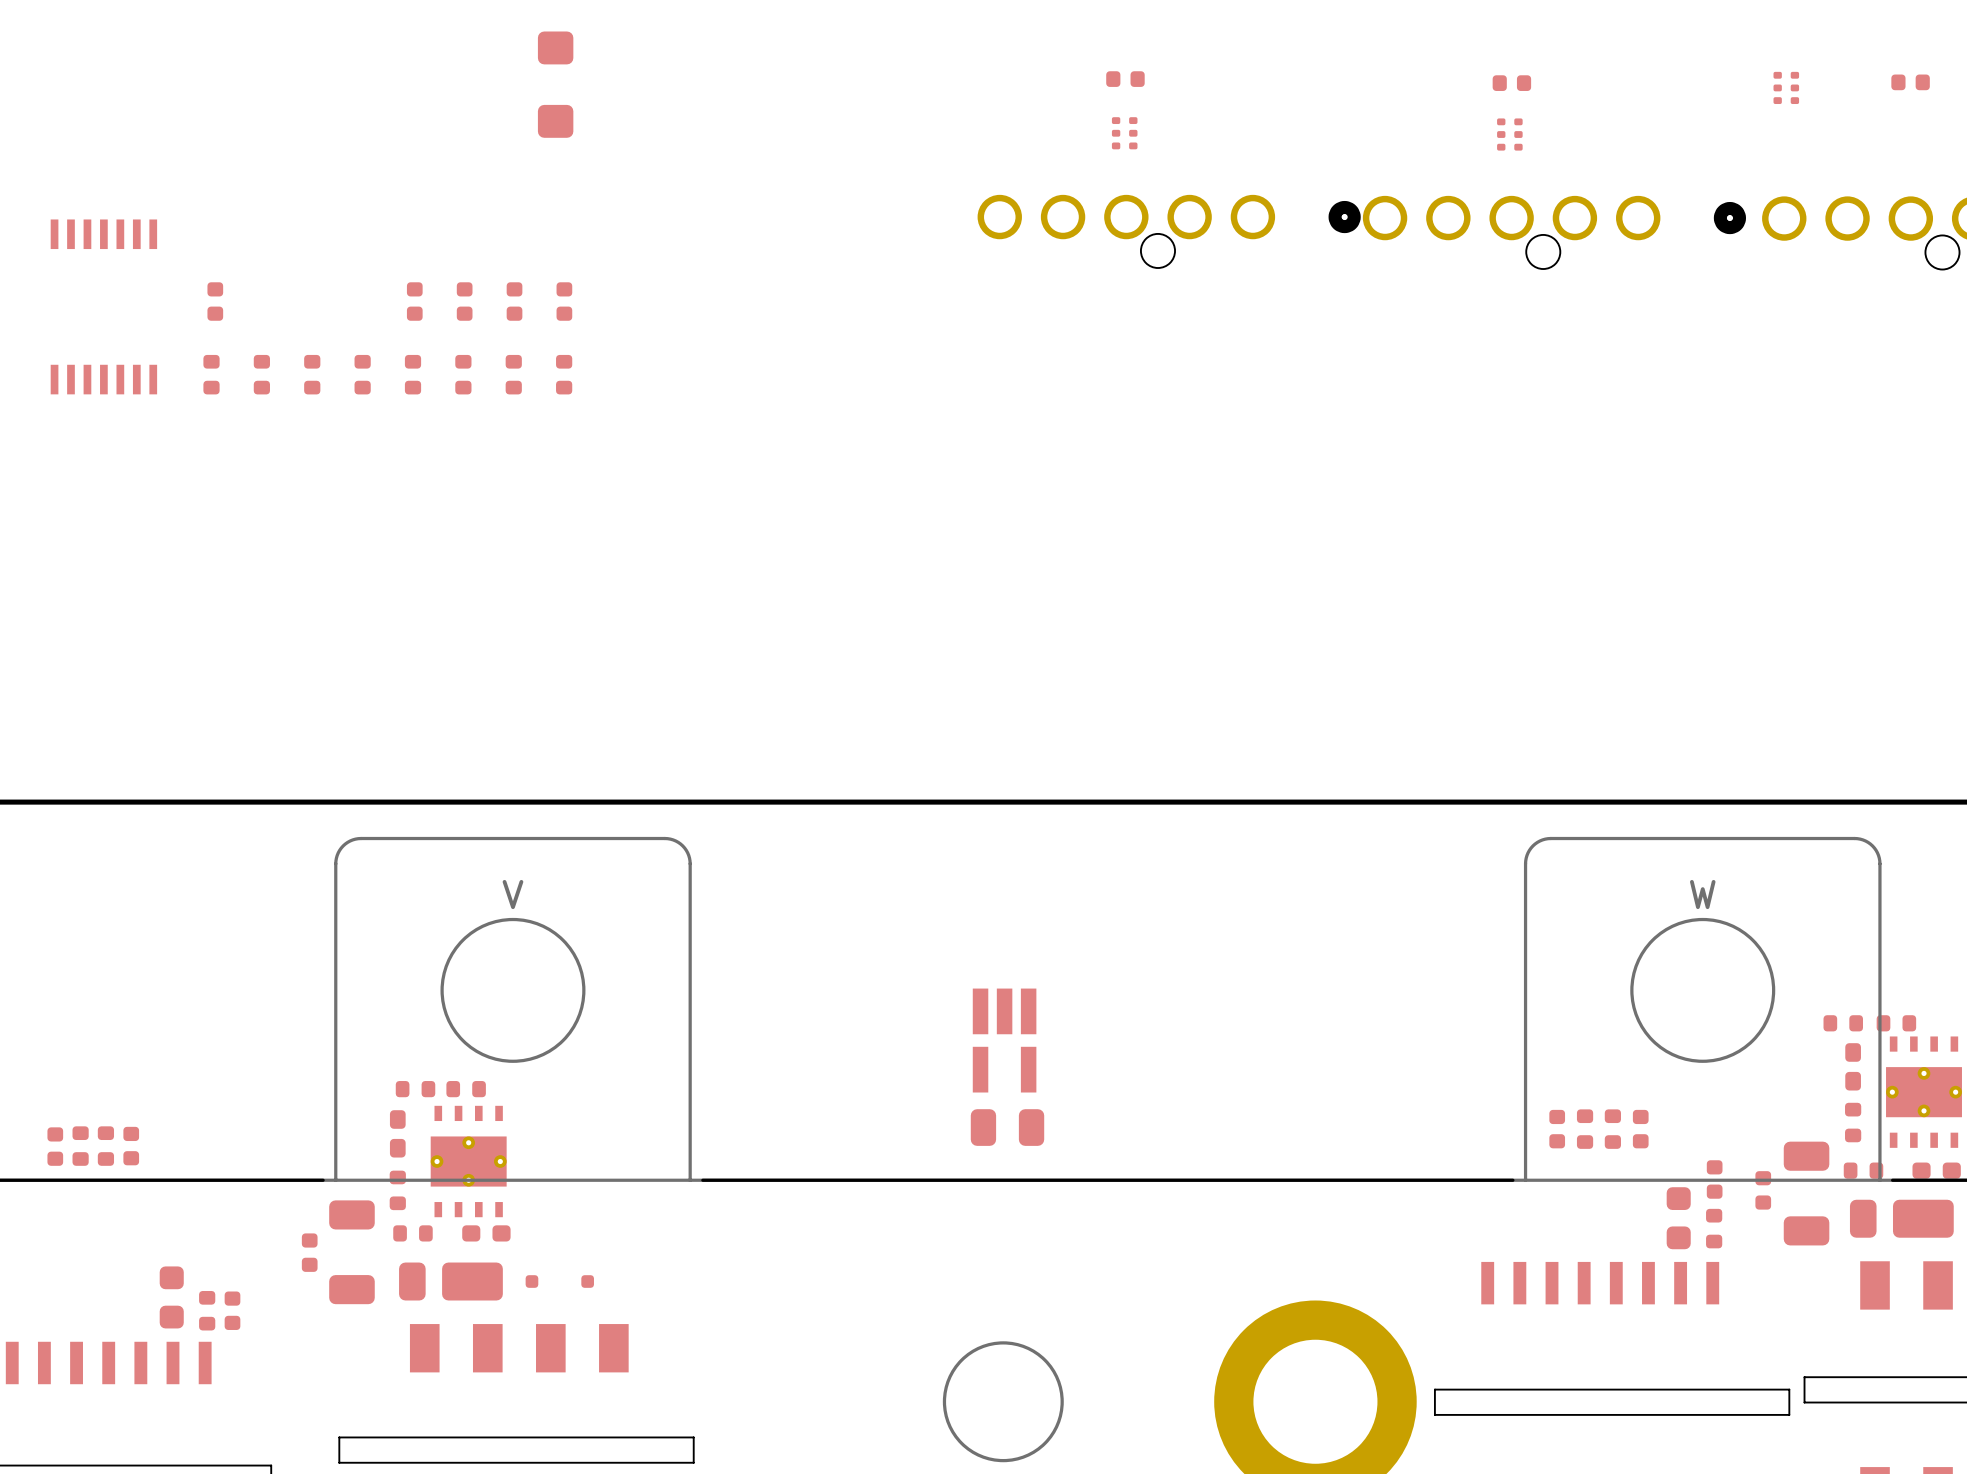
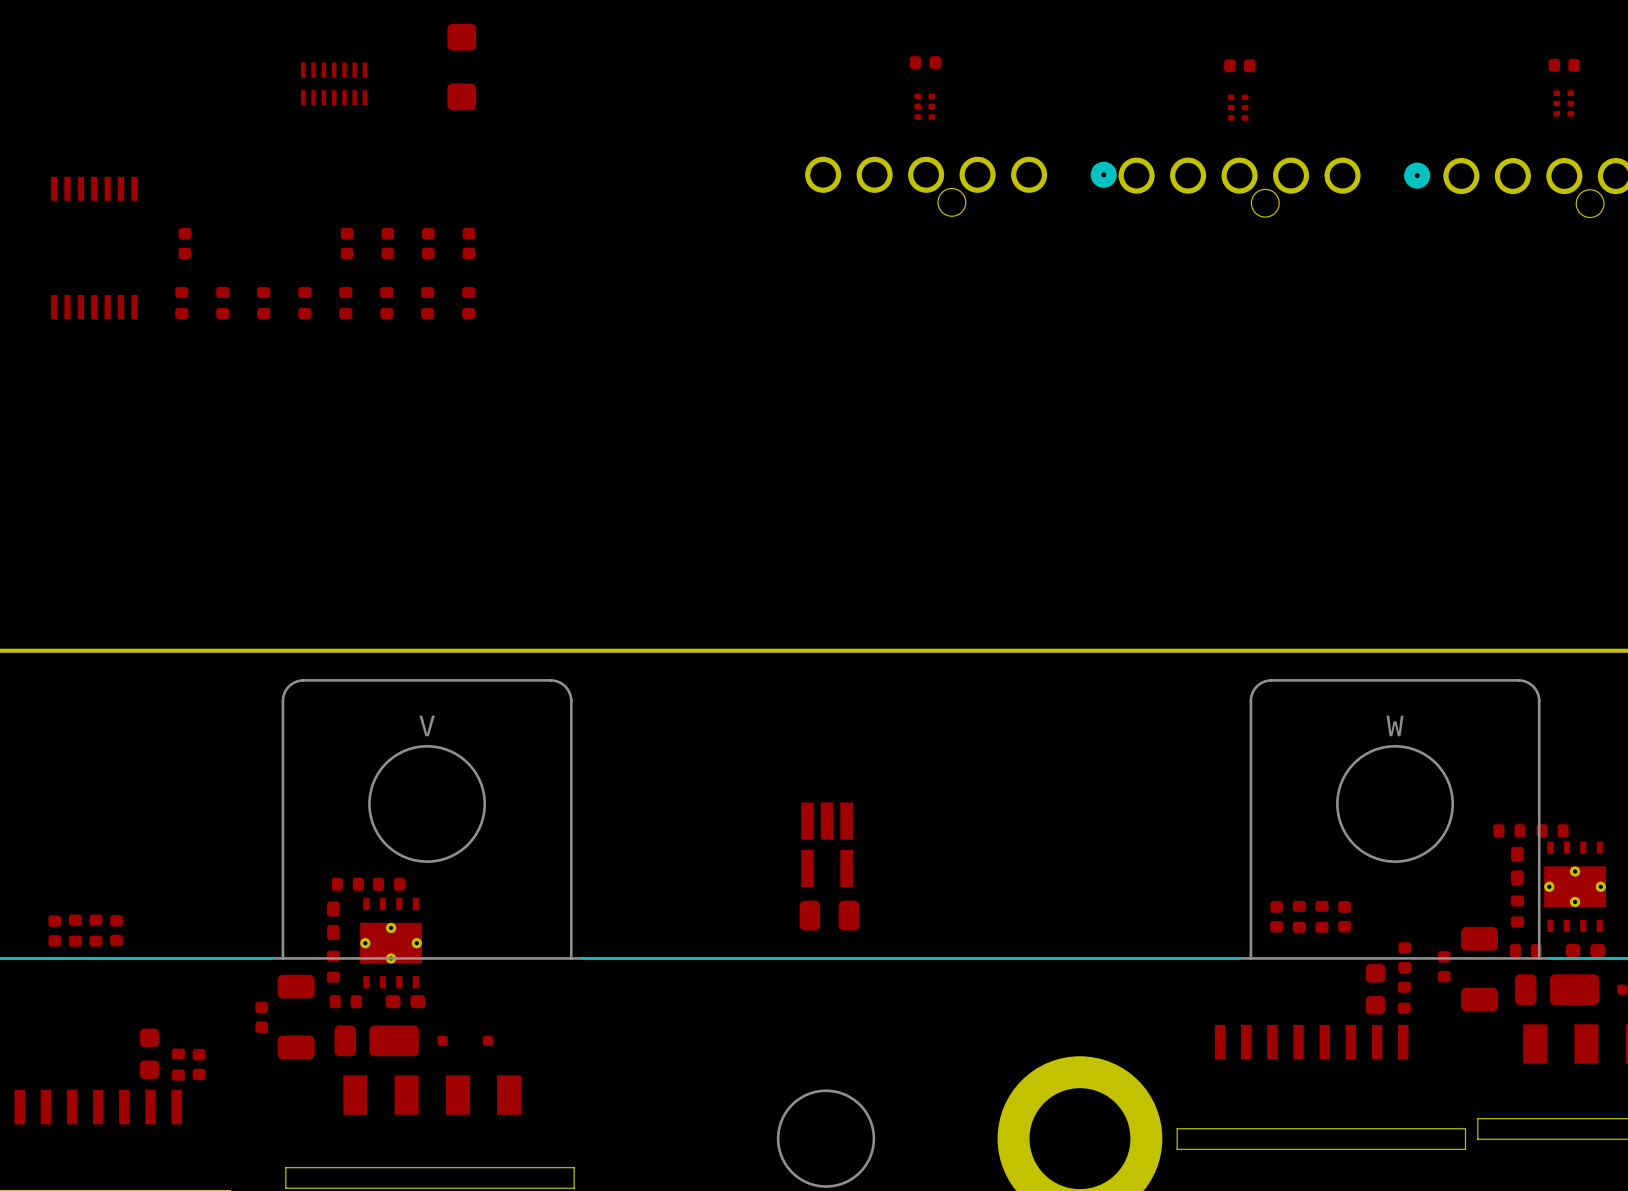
part position: (1786, 87) -> (1563, 103)
part: none -> (334, 83)

